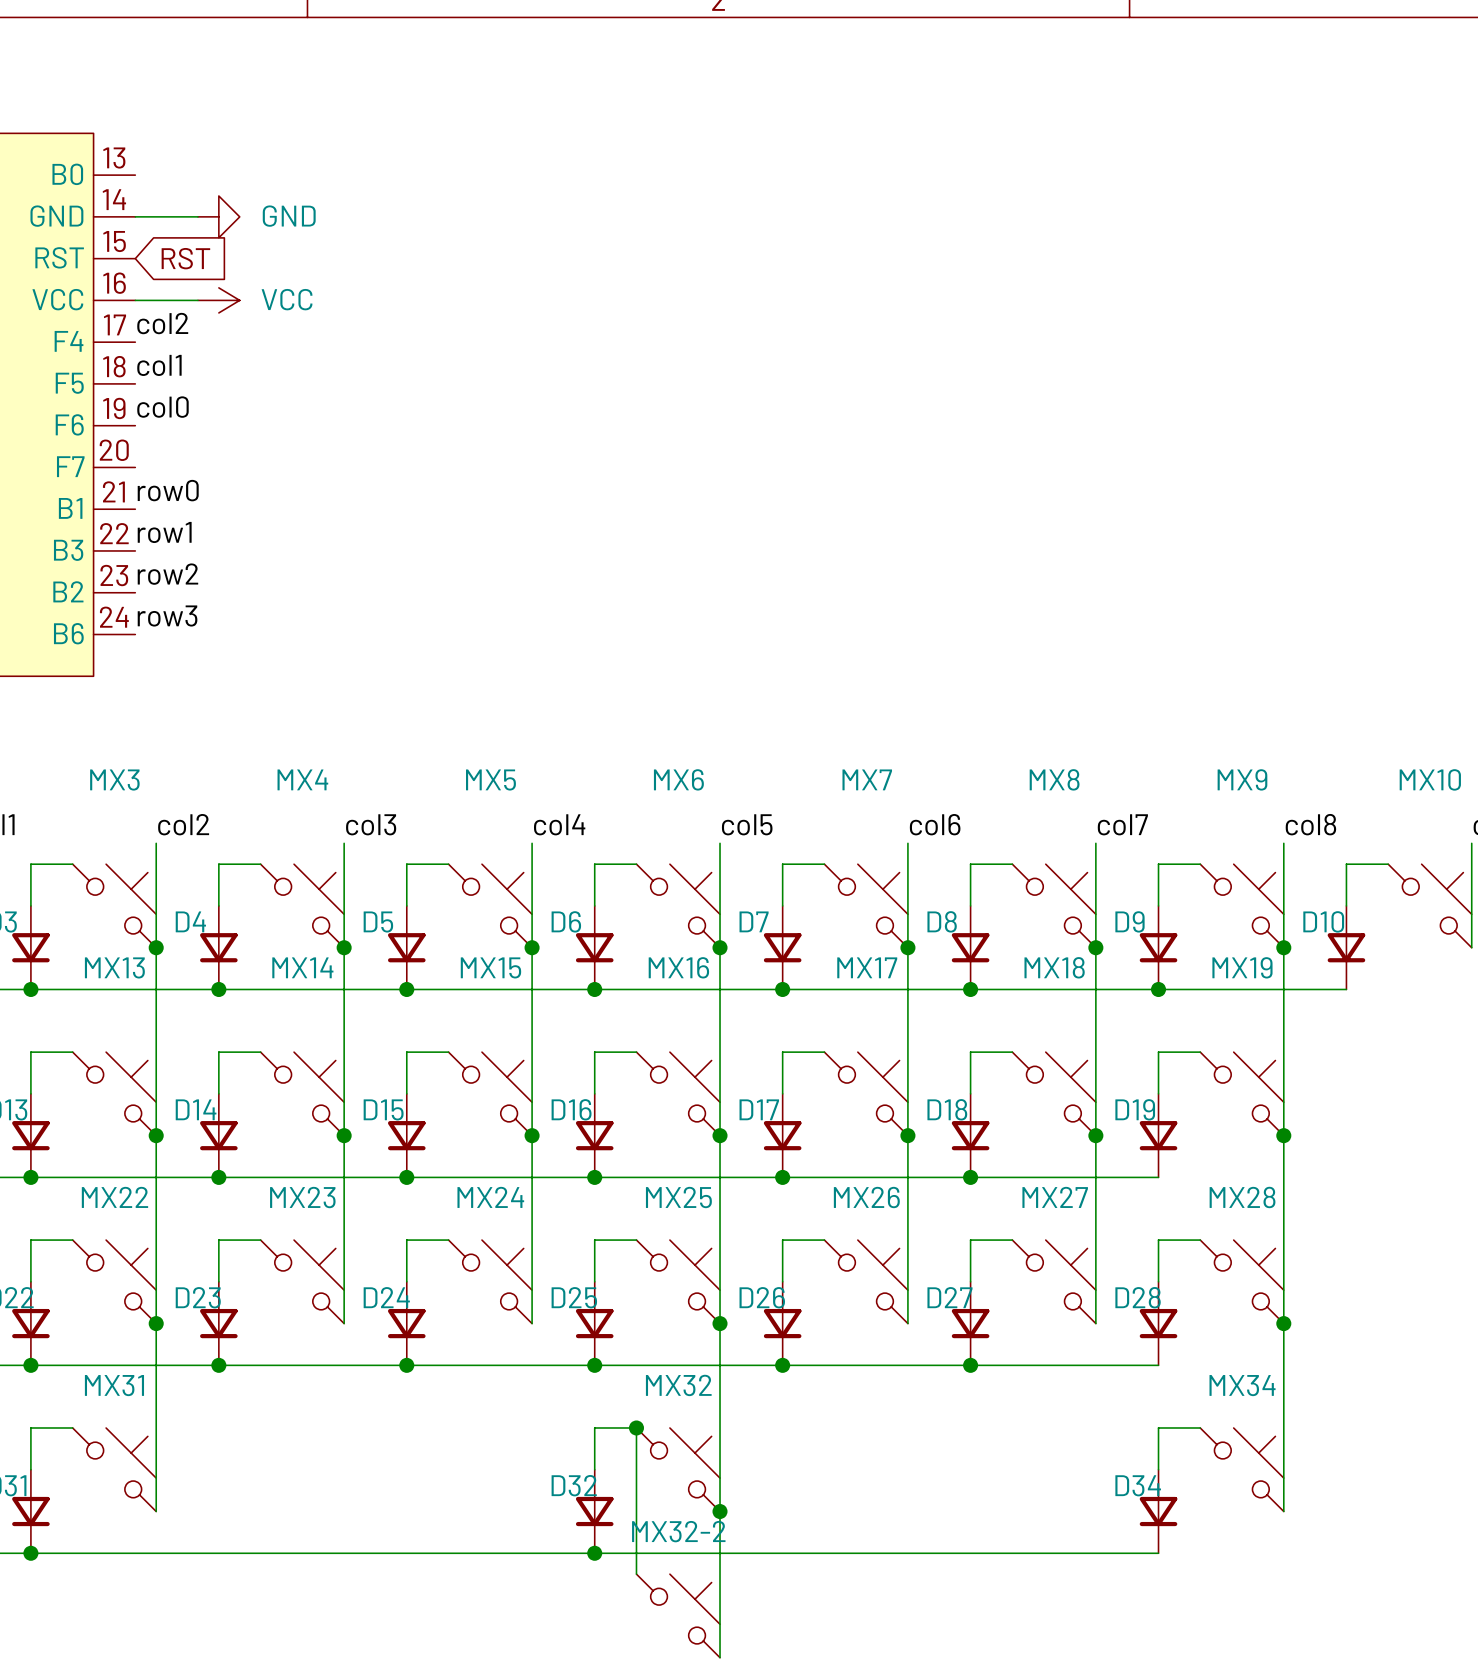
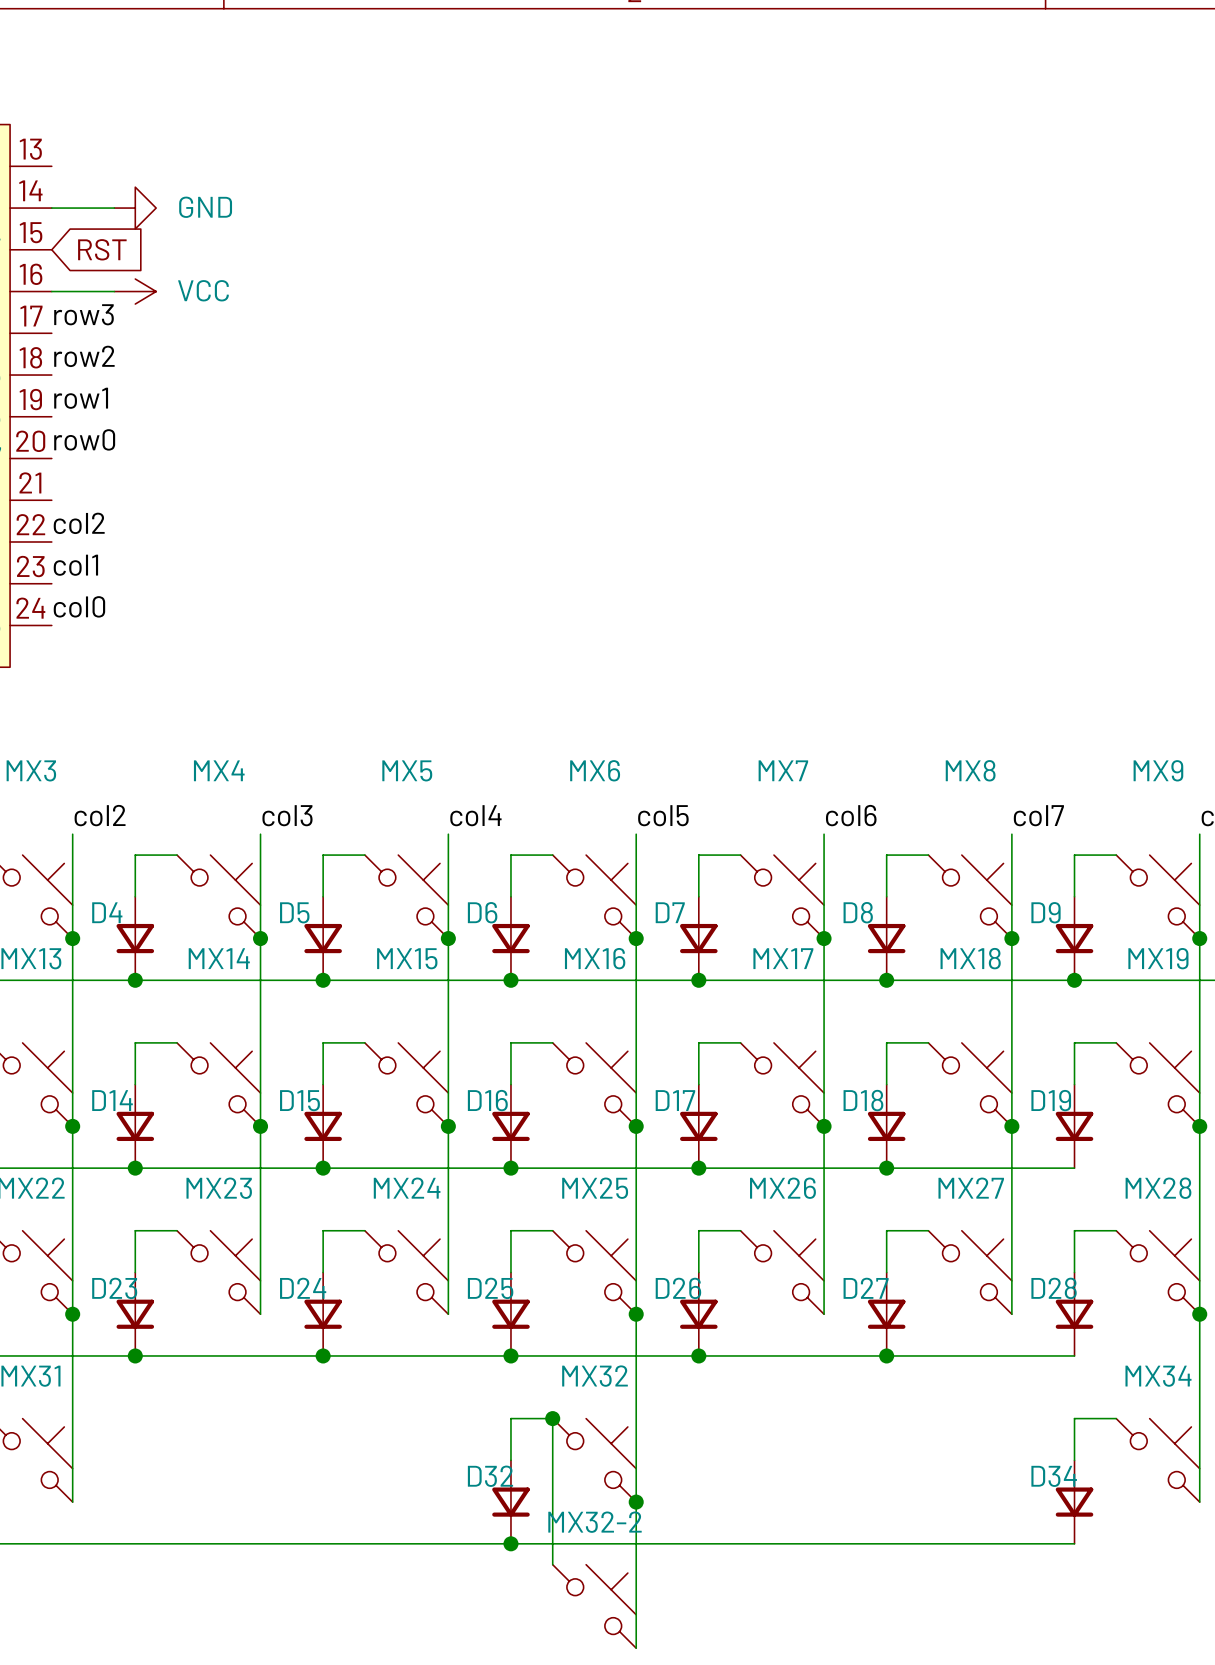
label: col2 (162, 323) -> row3 (84, 314)
label: col1 (159, 365) -> row2 (84, 356)
label: col0 (162, 407) -> row1 (81, 398)
label position: row0 (168, 490) -> row0 (84, 439)
label: row1 (164, 532) -> col2 (79, 523)
label: row2 (167, 574) -> col1 (75, 565)
label: row3 (167, 615) -> col0 (79, 606)

